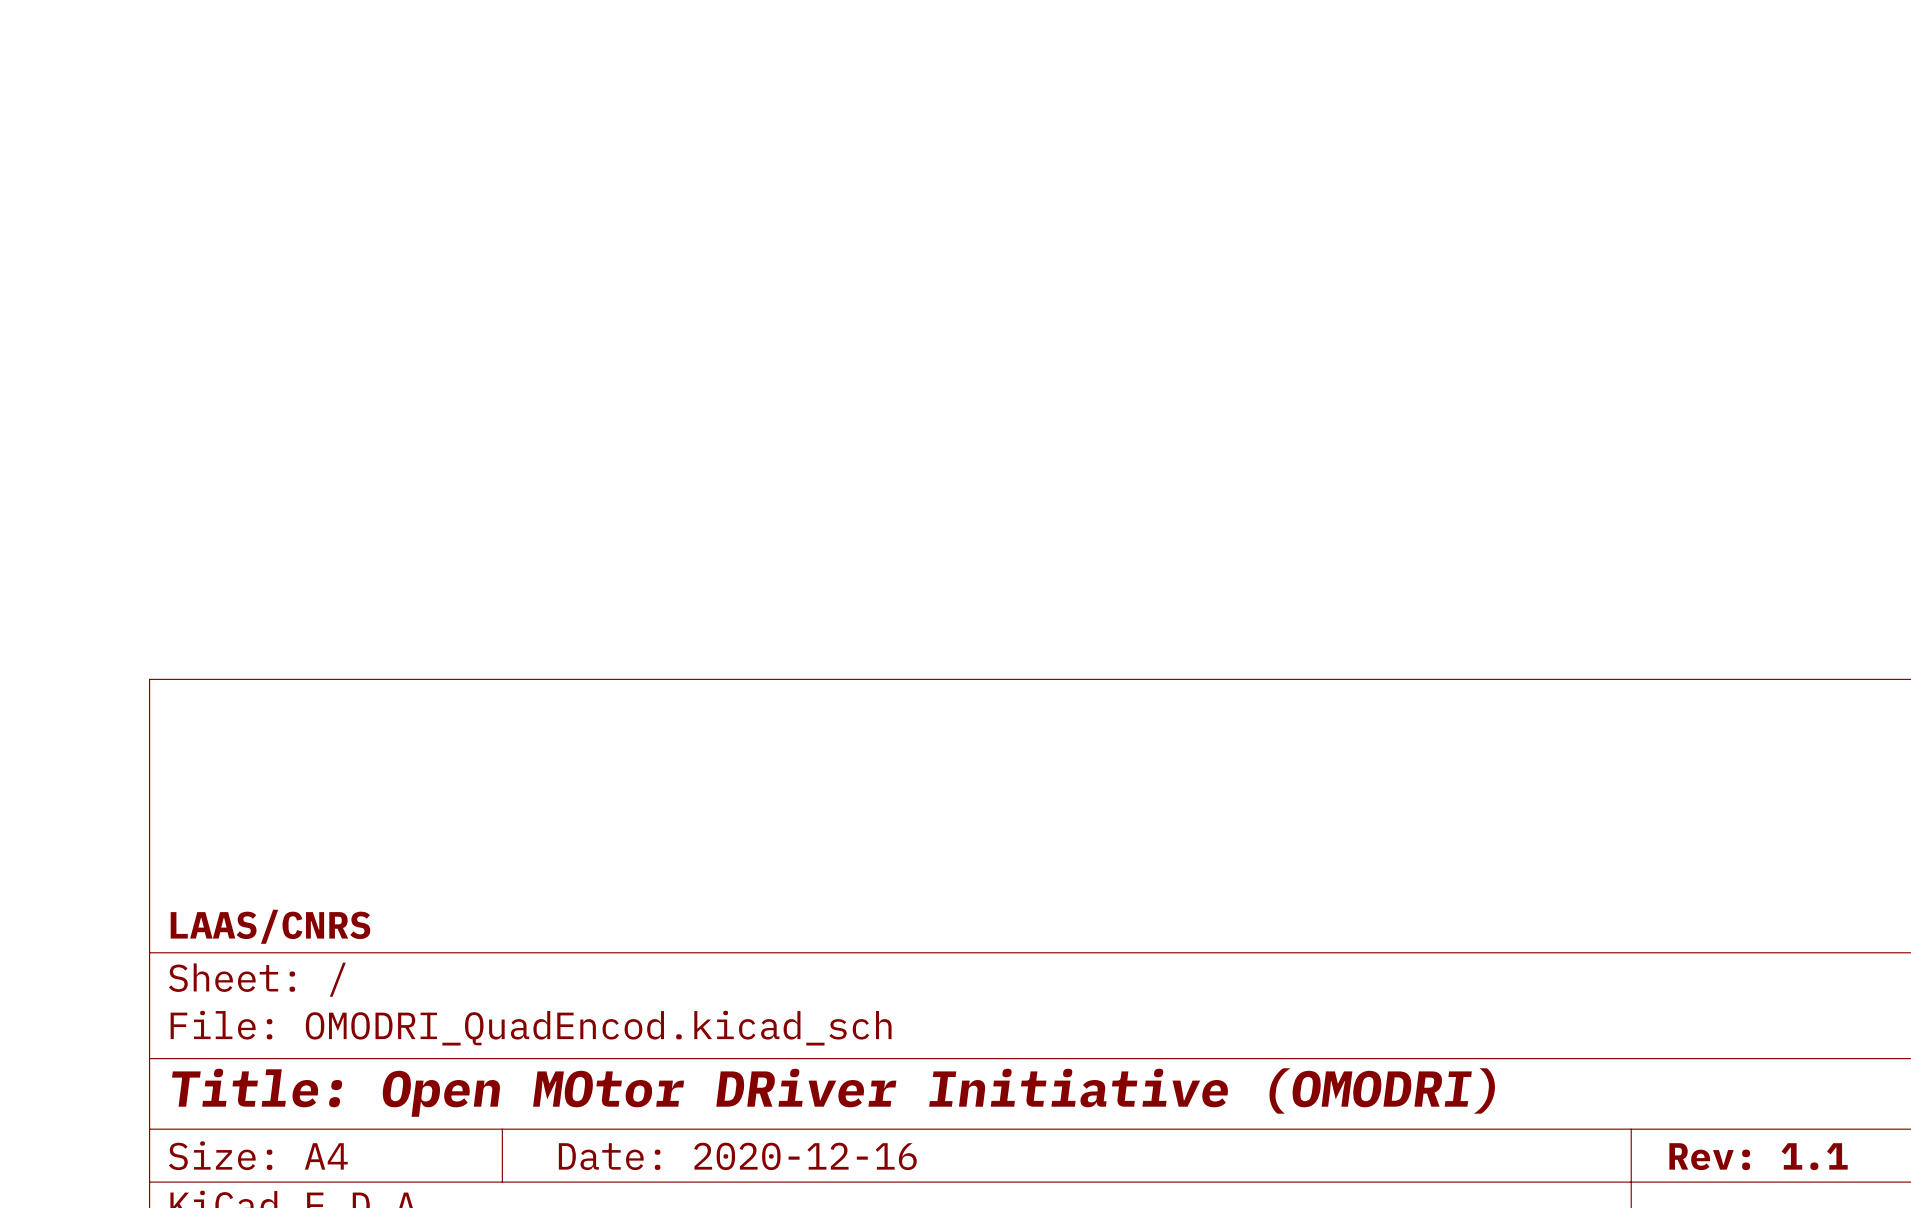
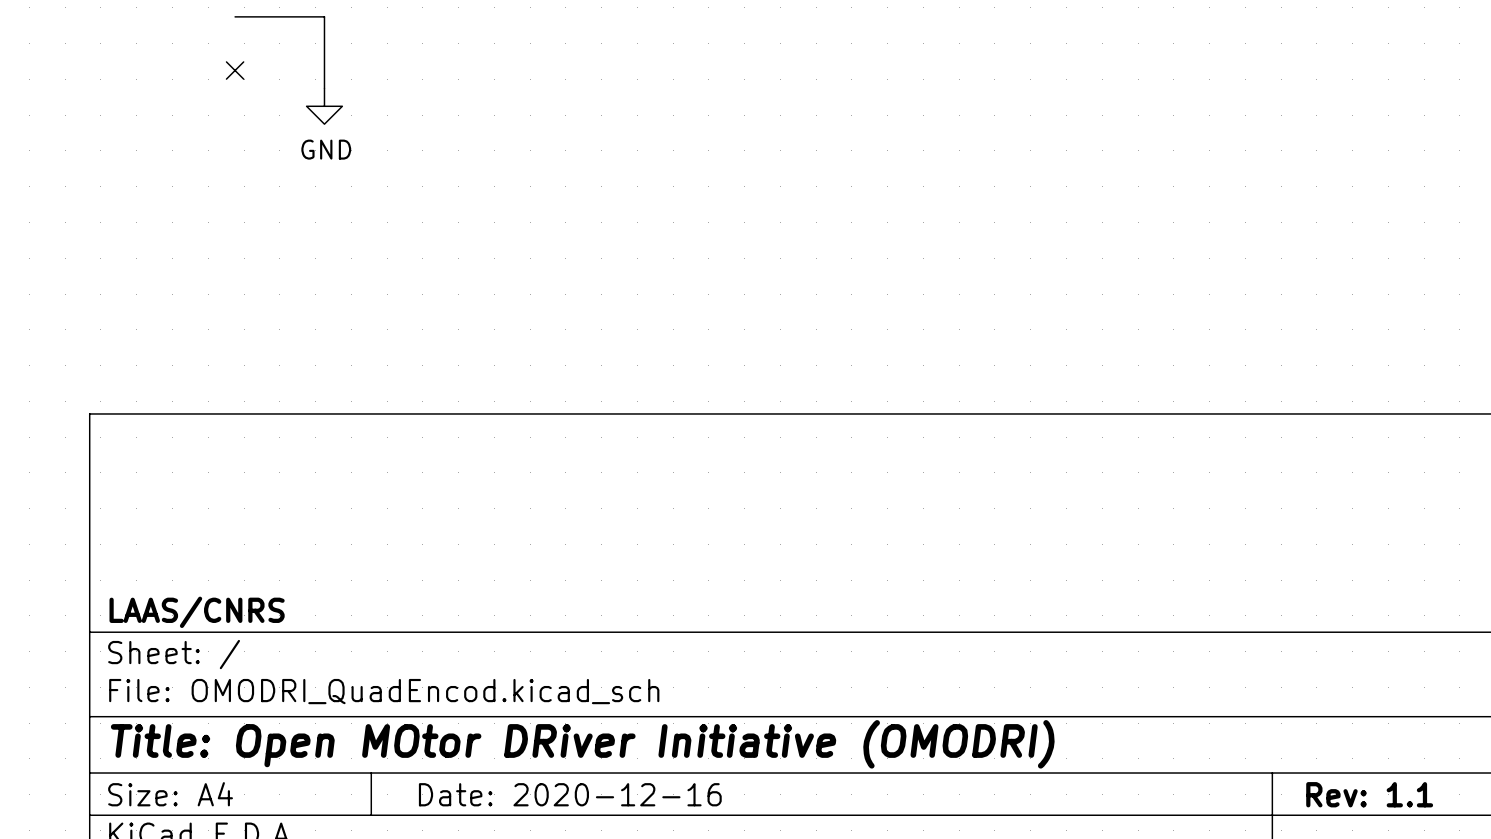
wire: none -> (235, 16) (324, 16) (324, 88)
no-connect mark: none -> (235, 70)
power symbol: none -> GND (324, 106)

